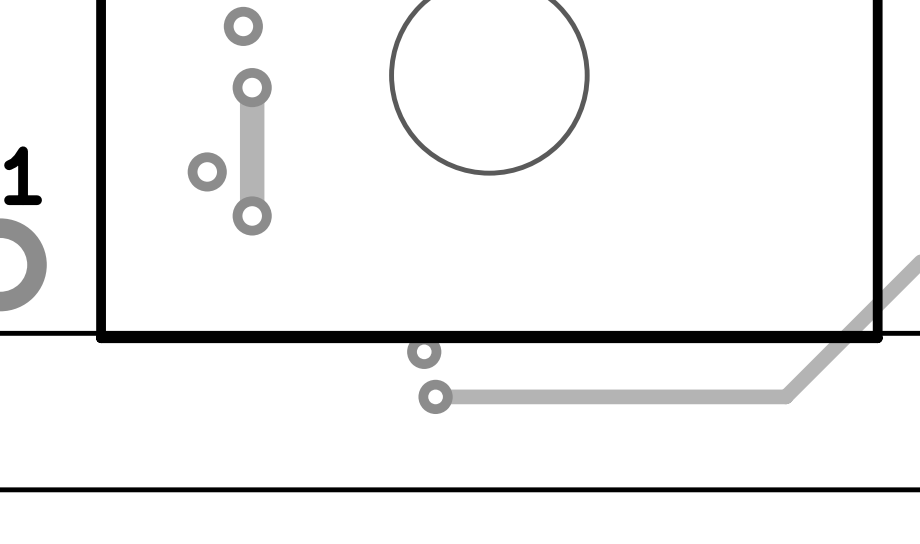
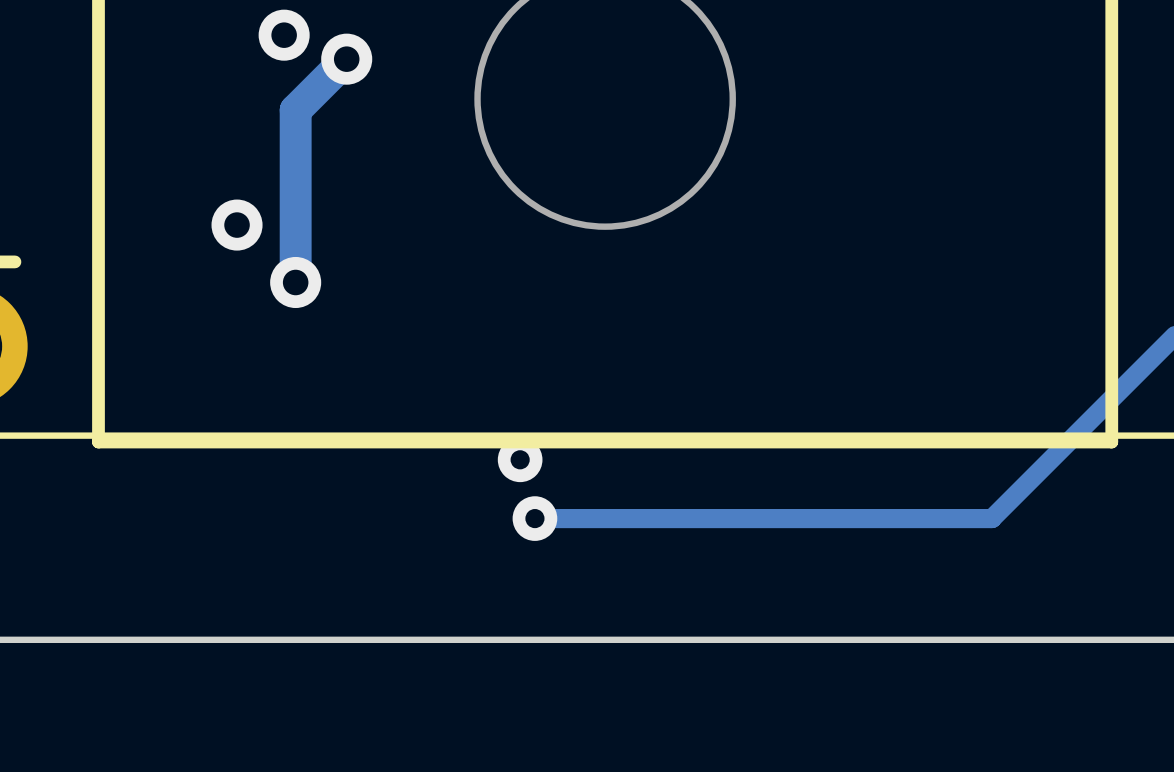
track: none -> (346, 59) (295, 110) (295, 115)
via position: (252, 87) -> (346, 59)

